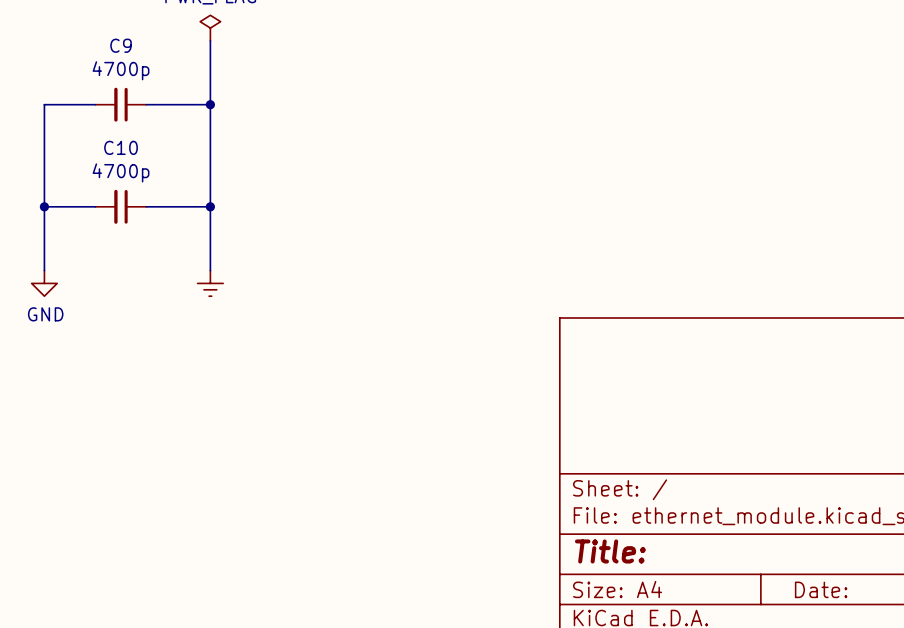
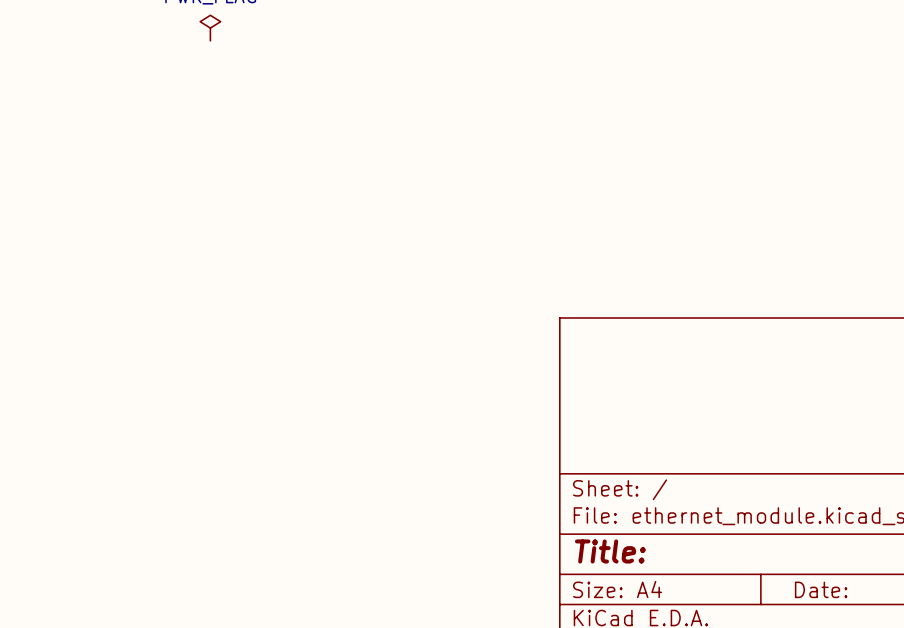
wire: (210, 40) (210, 270) -> none
wire: (95, 104) (44, 104) (44, 270) -> none
C9: 4700p (121, 104) -> none
wire: (146, 104) (210, 104) -> none
junction: (210, 104) -> none
wire: (44, 206) (95, 206) -> none
junction: (44, 206) -> none
C10: 4700p (121, 206) -> none
wire: (146, 206) (210, 206) -> none
junction: (210, 206) -> none
power symbol: GND (44, 283) -> none
power symbol: (210, 283) -> none

